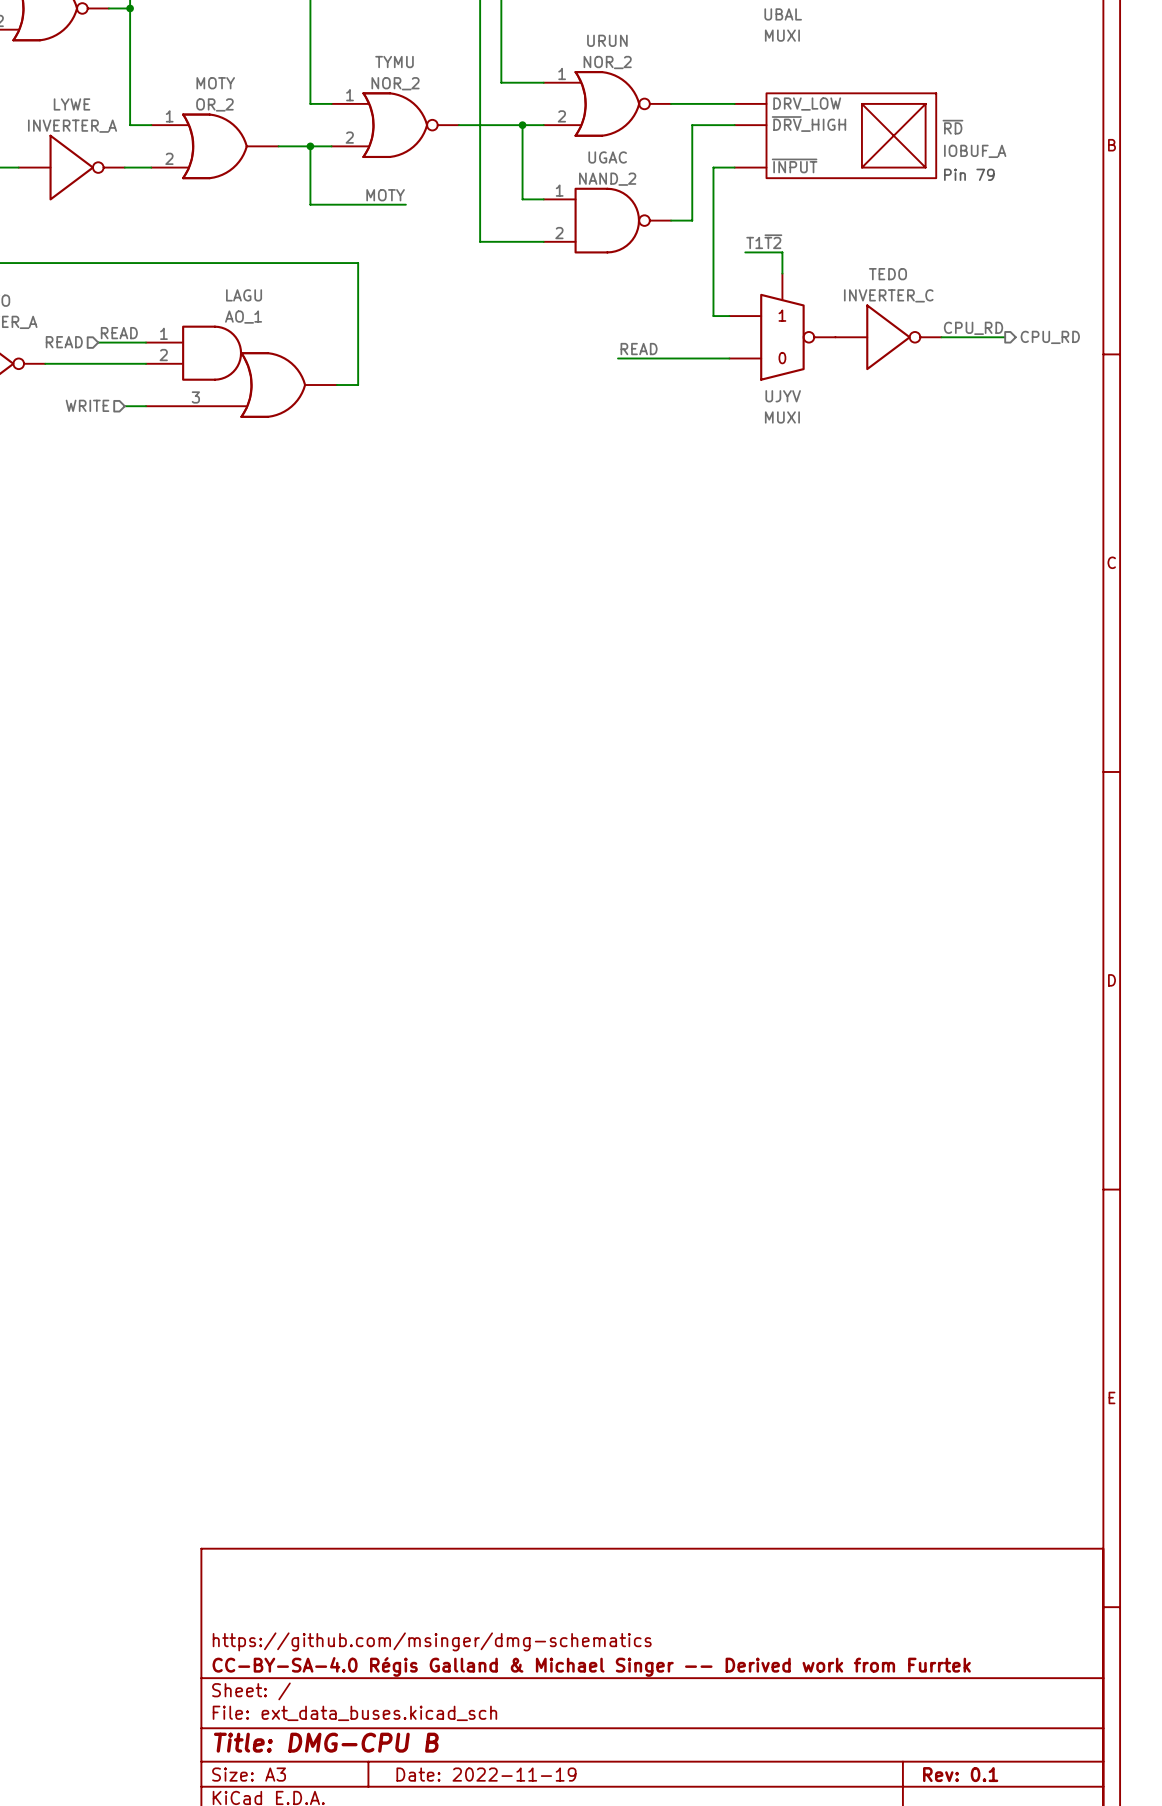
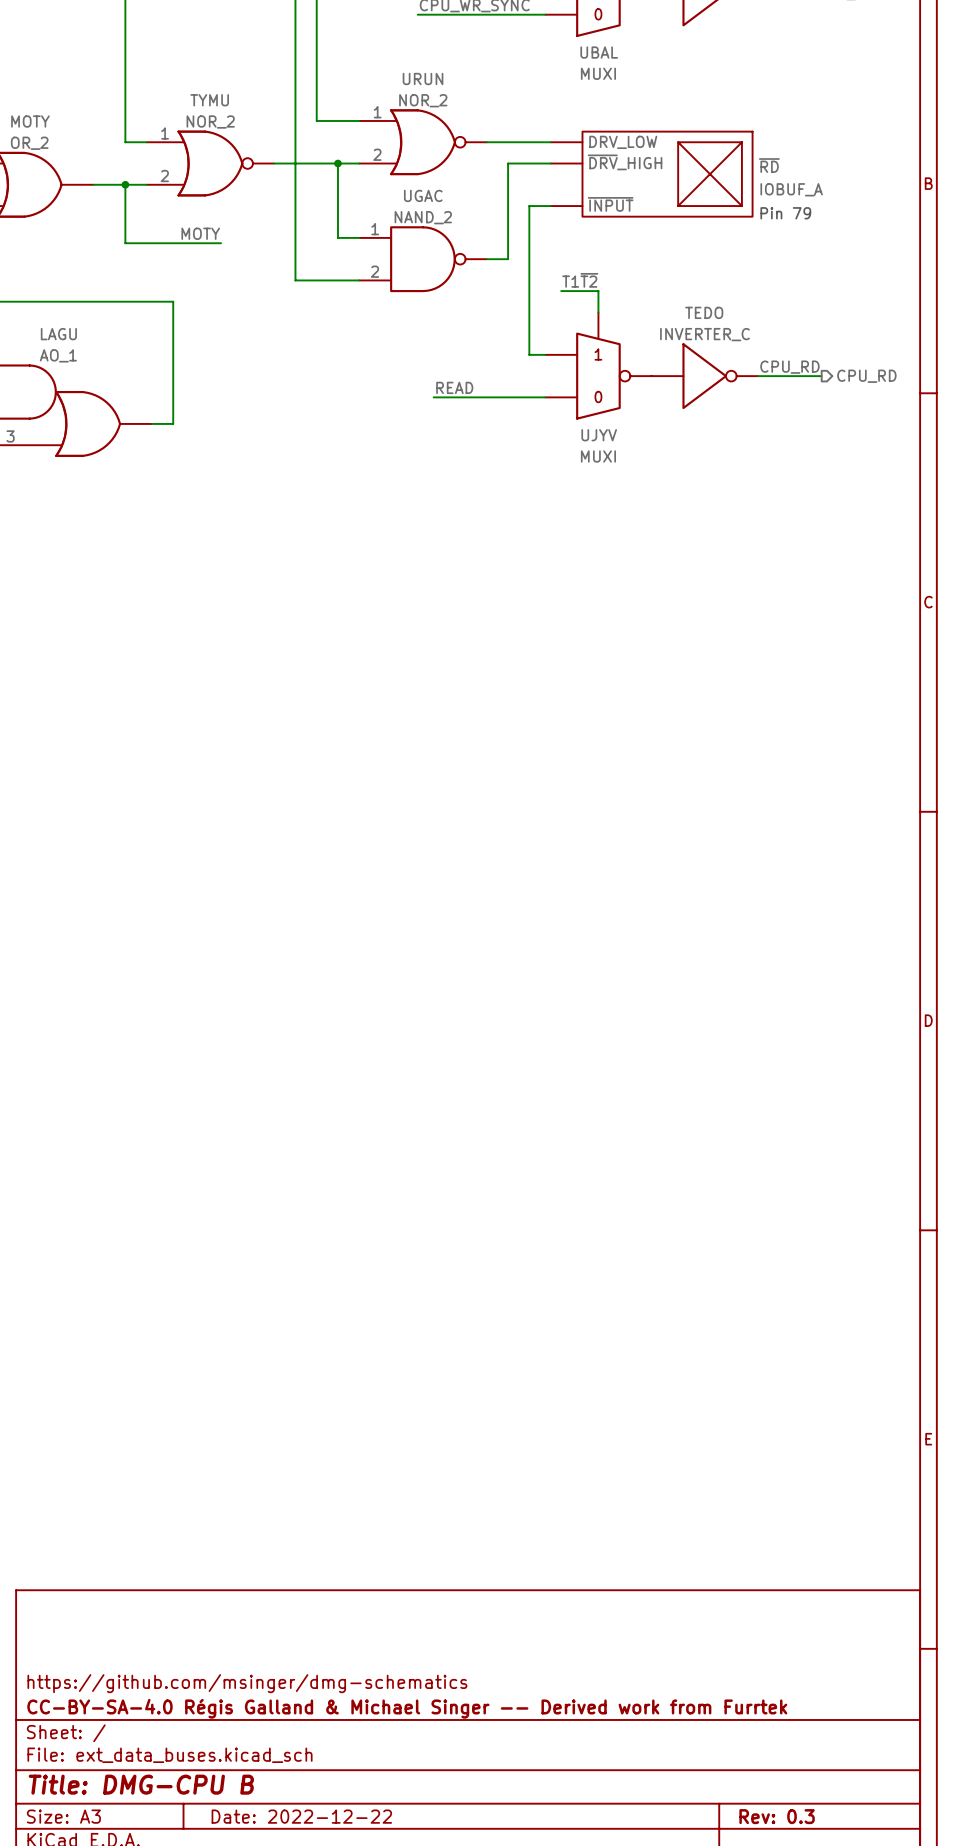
title block: Date: 2022-11-19 (486, 1774) -> Date: 2022-12-22 (301, 1816)
title block: Rev: 0.1 (960, 1774) -> Rev: 0.3 (777, 1816)

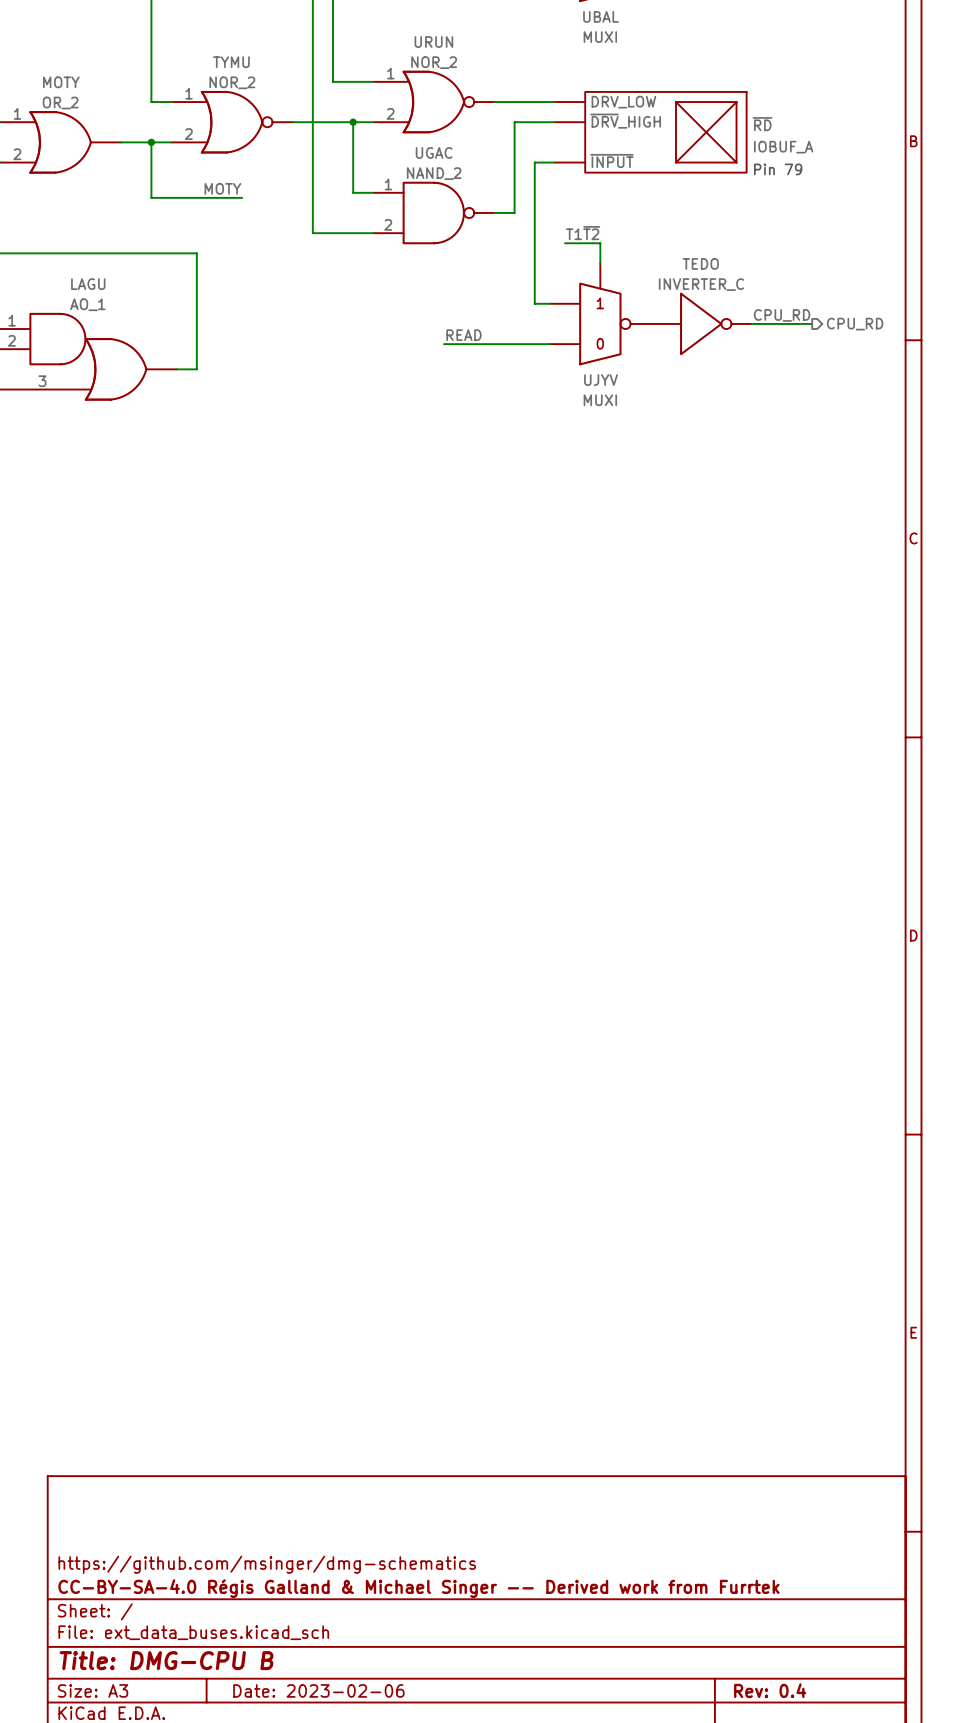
title block: Date: 2022-12-22 (301, 1816) -> Date: 2023-02-06 (318, 1690)
title block: Rev: 0.3 (777, 1816) -> Rev: 0.4 (770, 1690)

